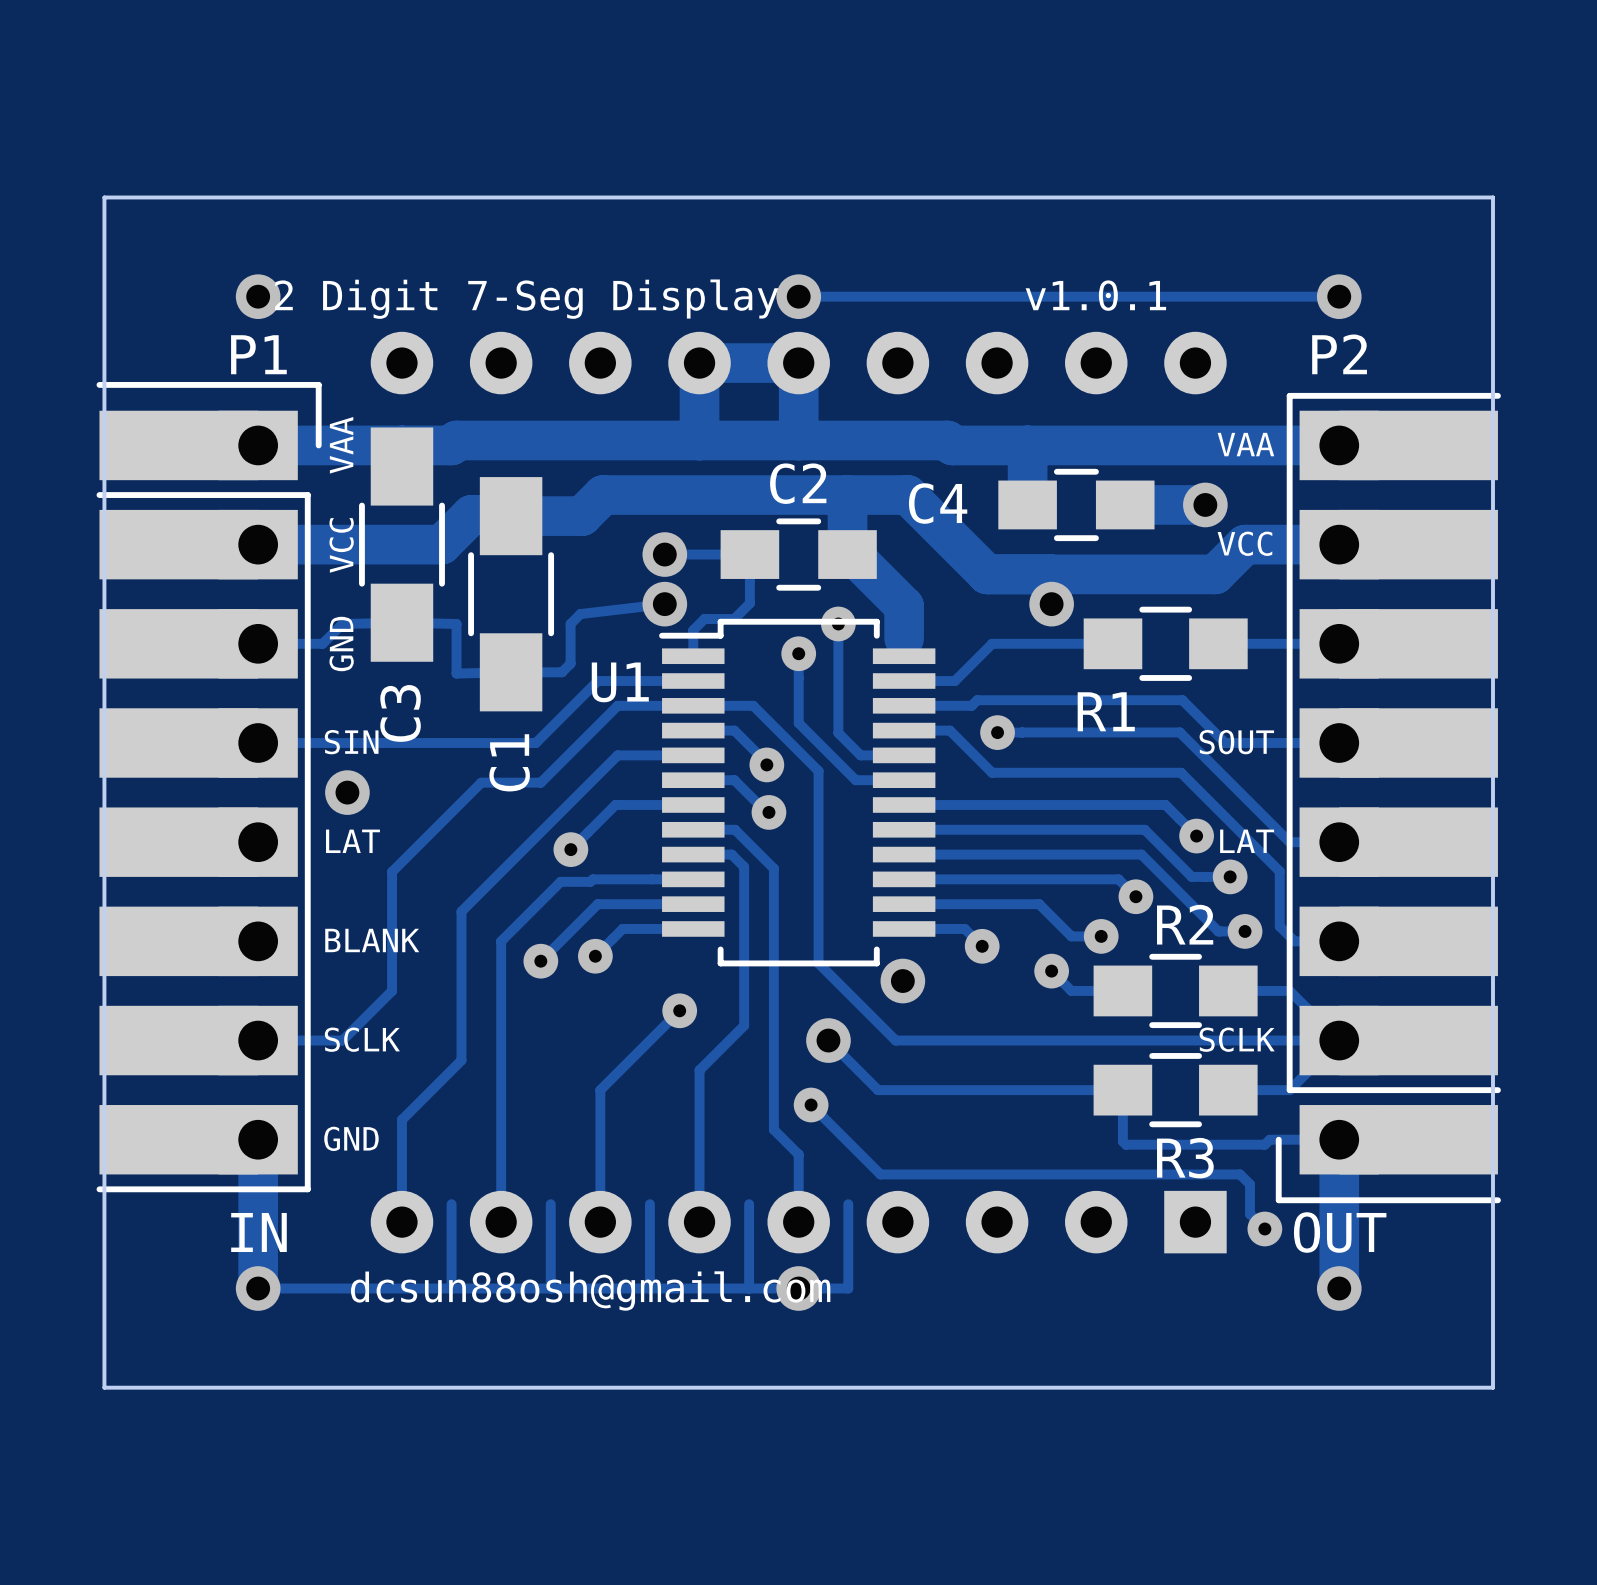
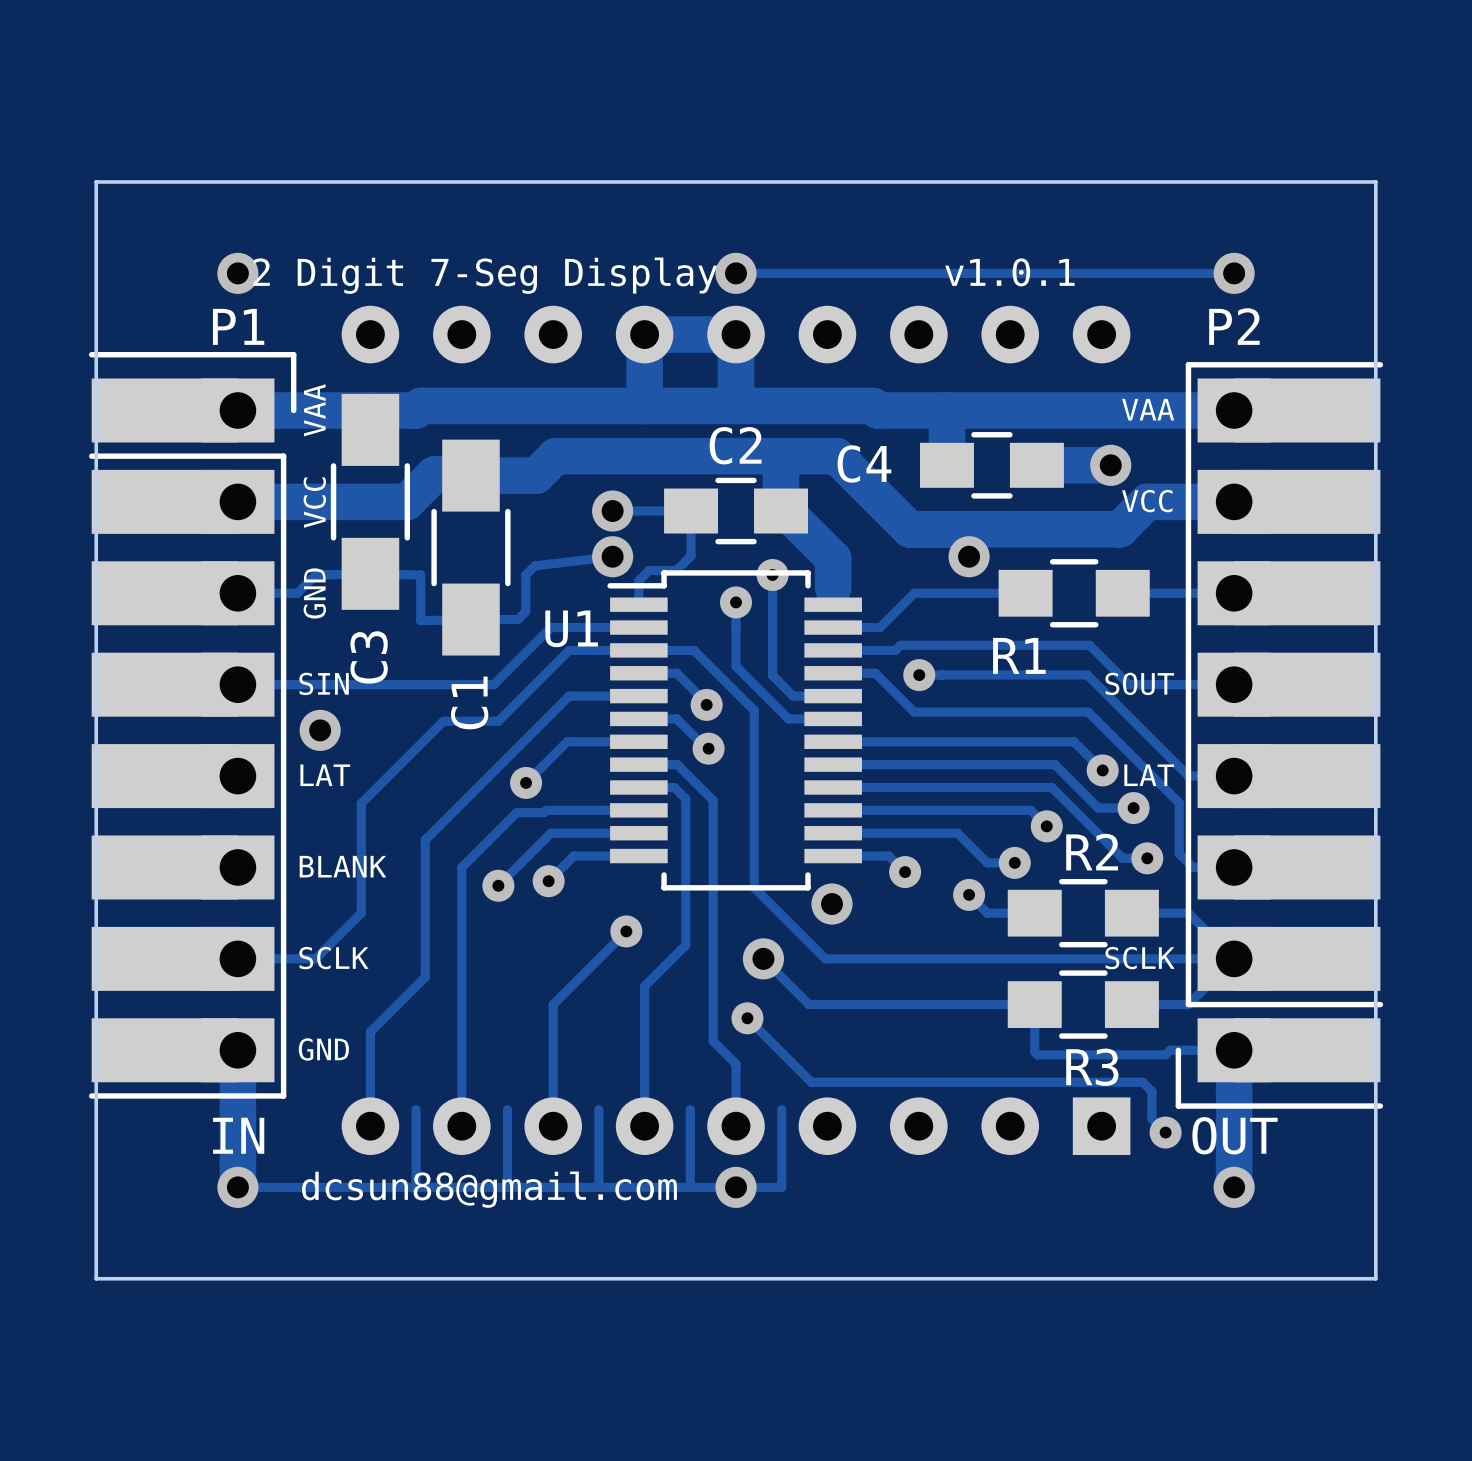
text: dcsun88osh@gmail.com (590, 1291) -> dcsun88@gmail.com (489, 1189)

